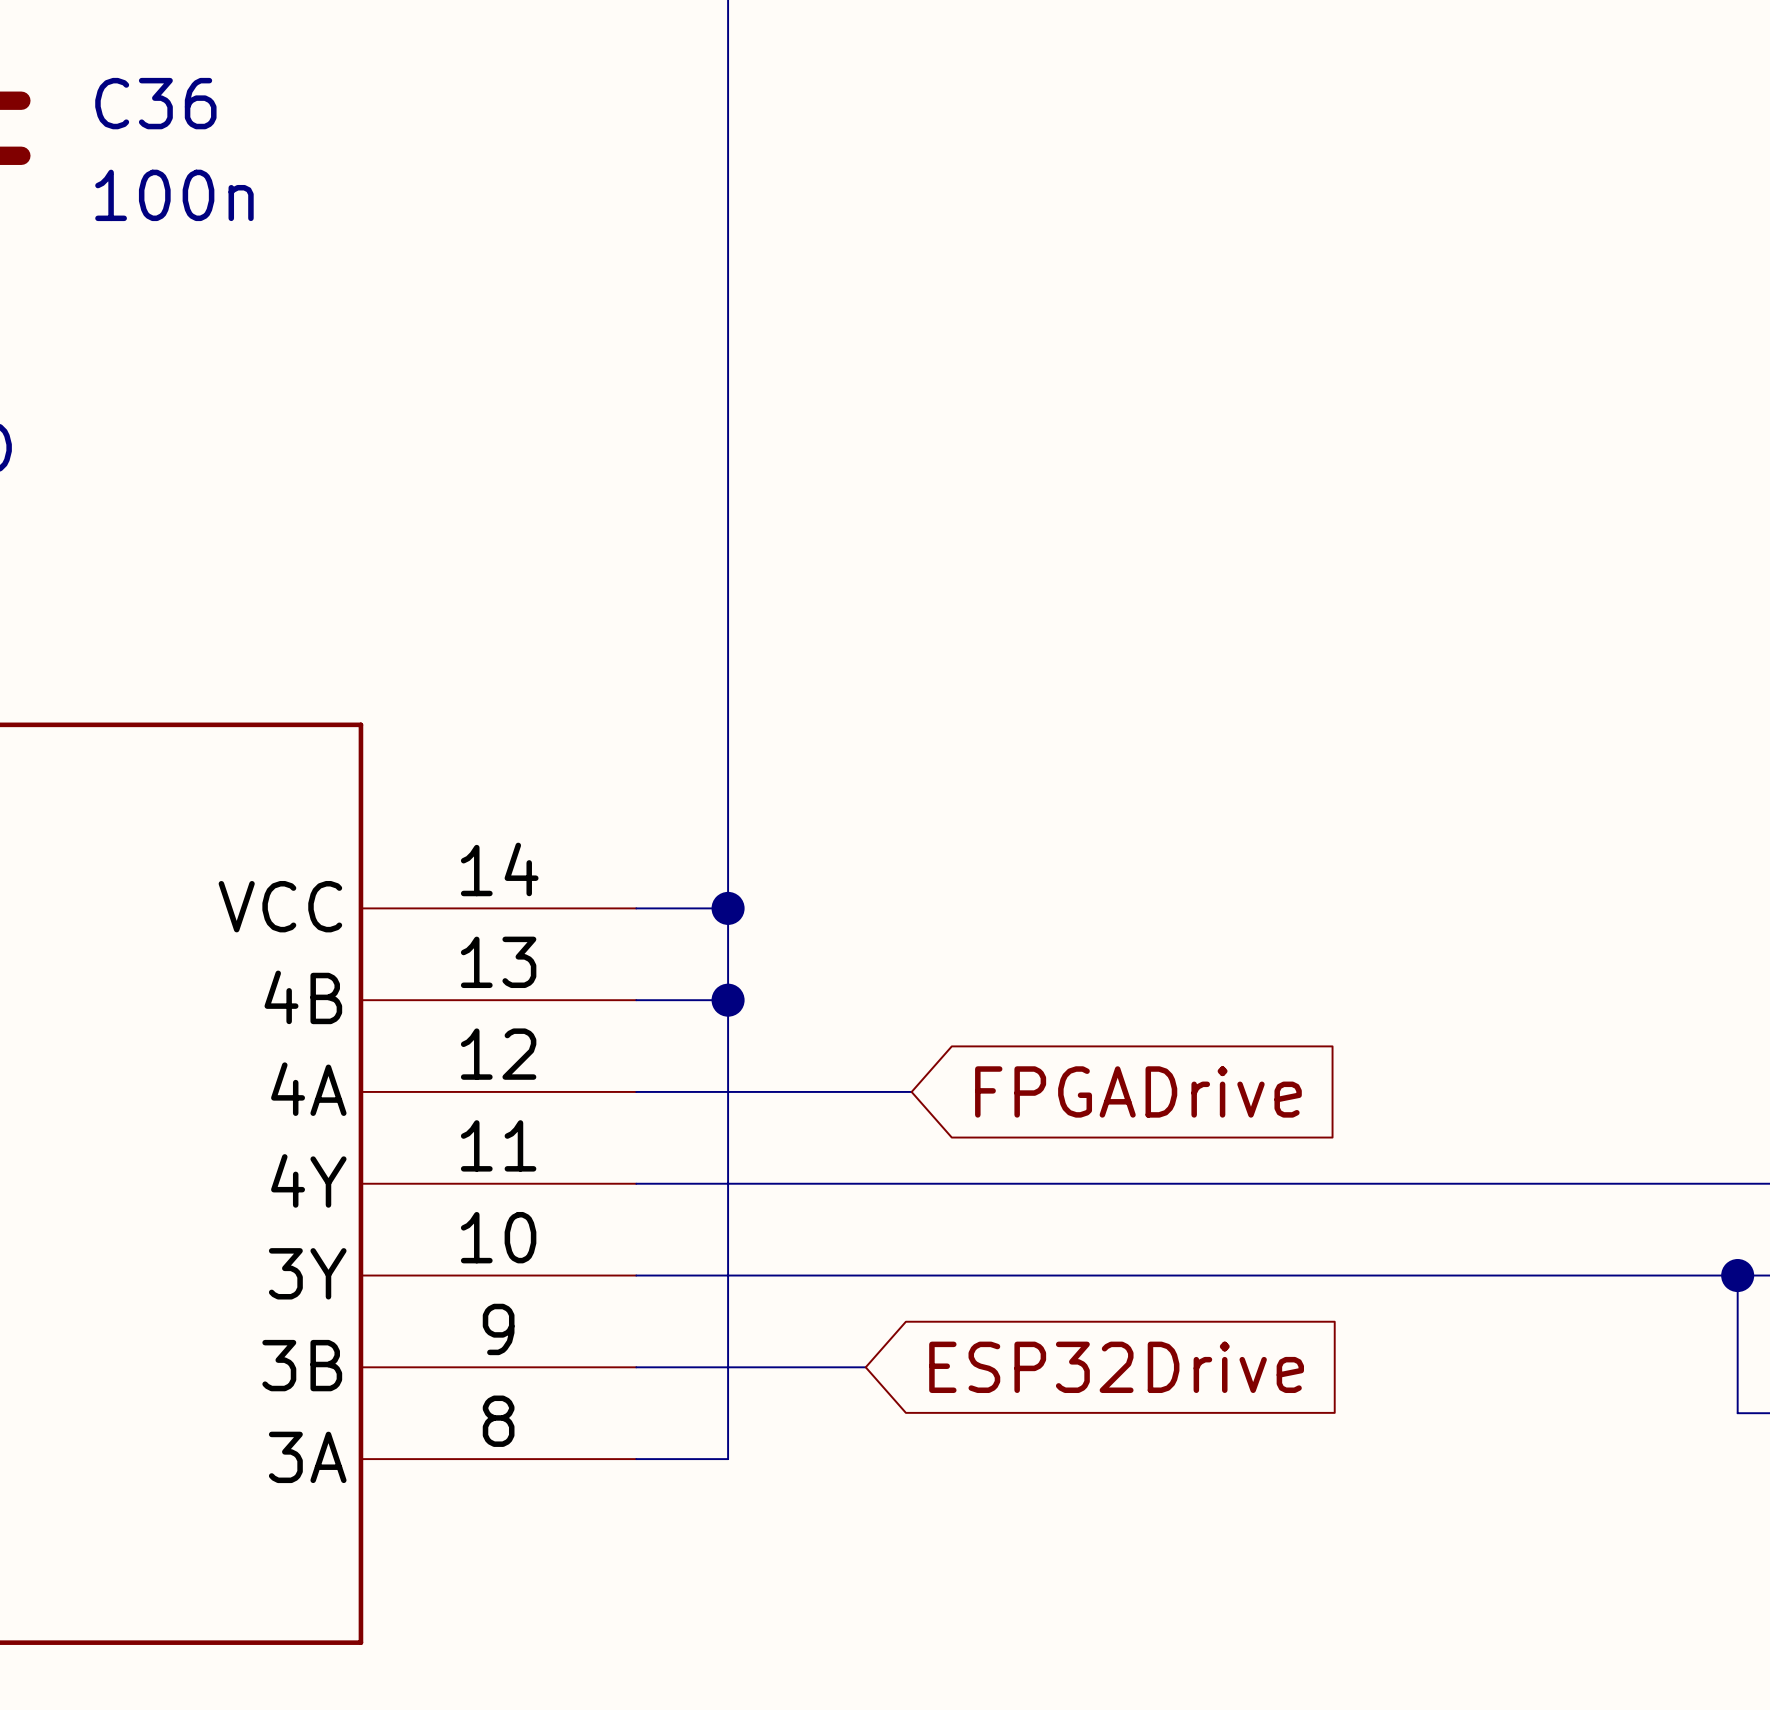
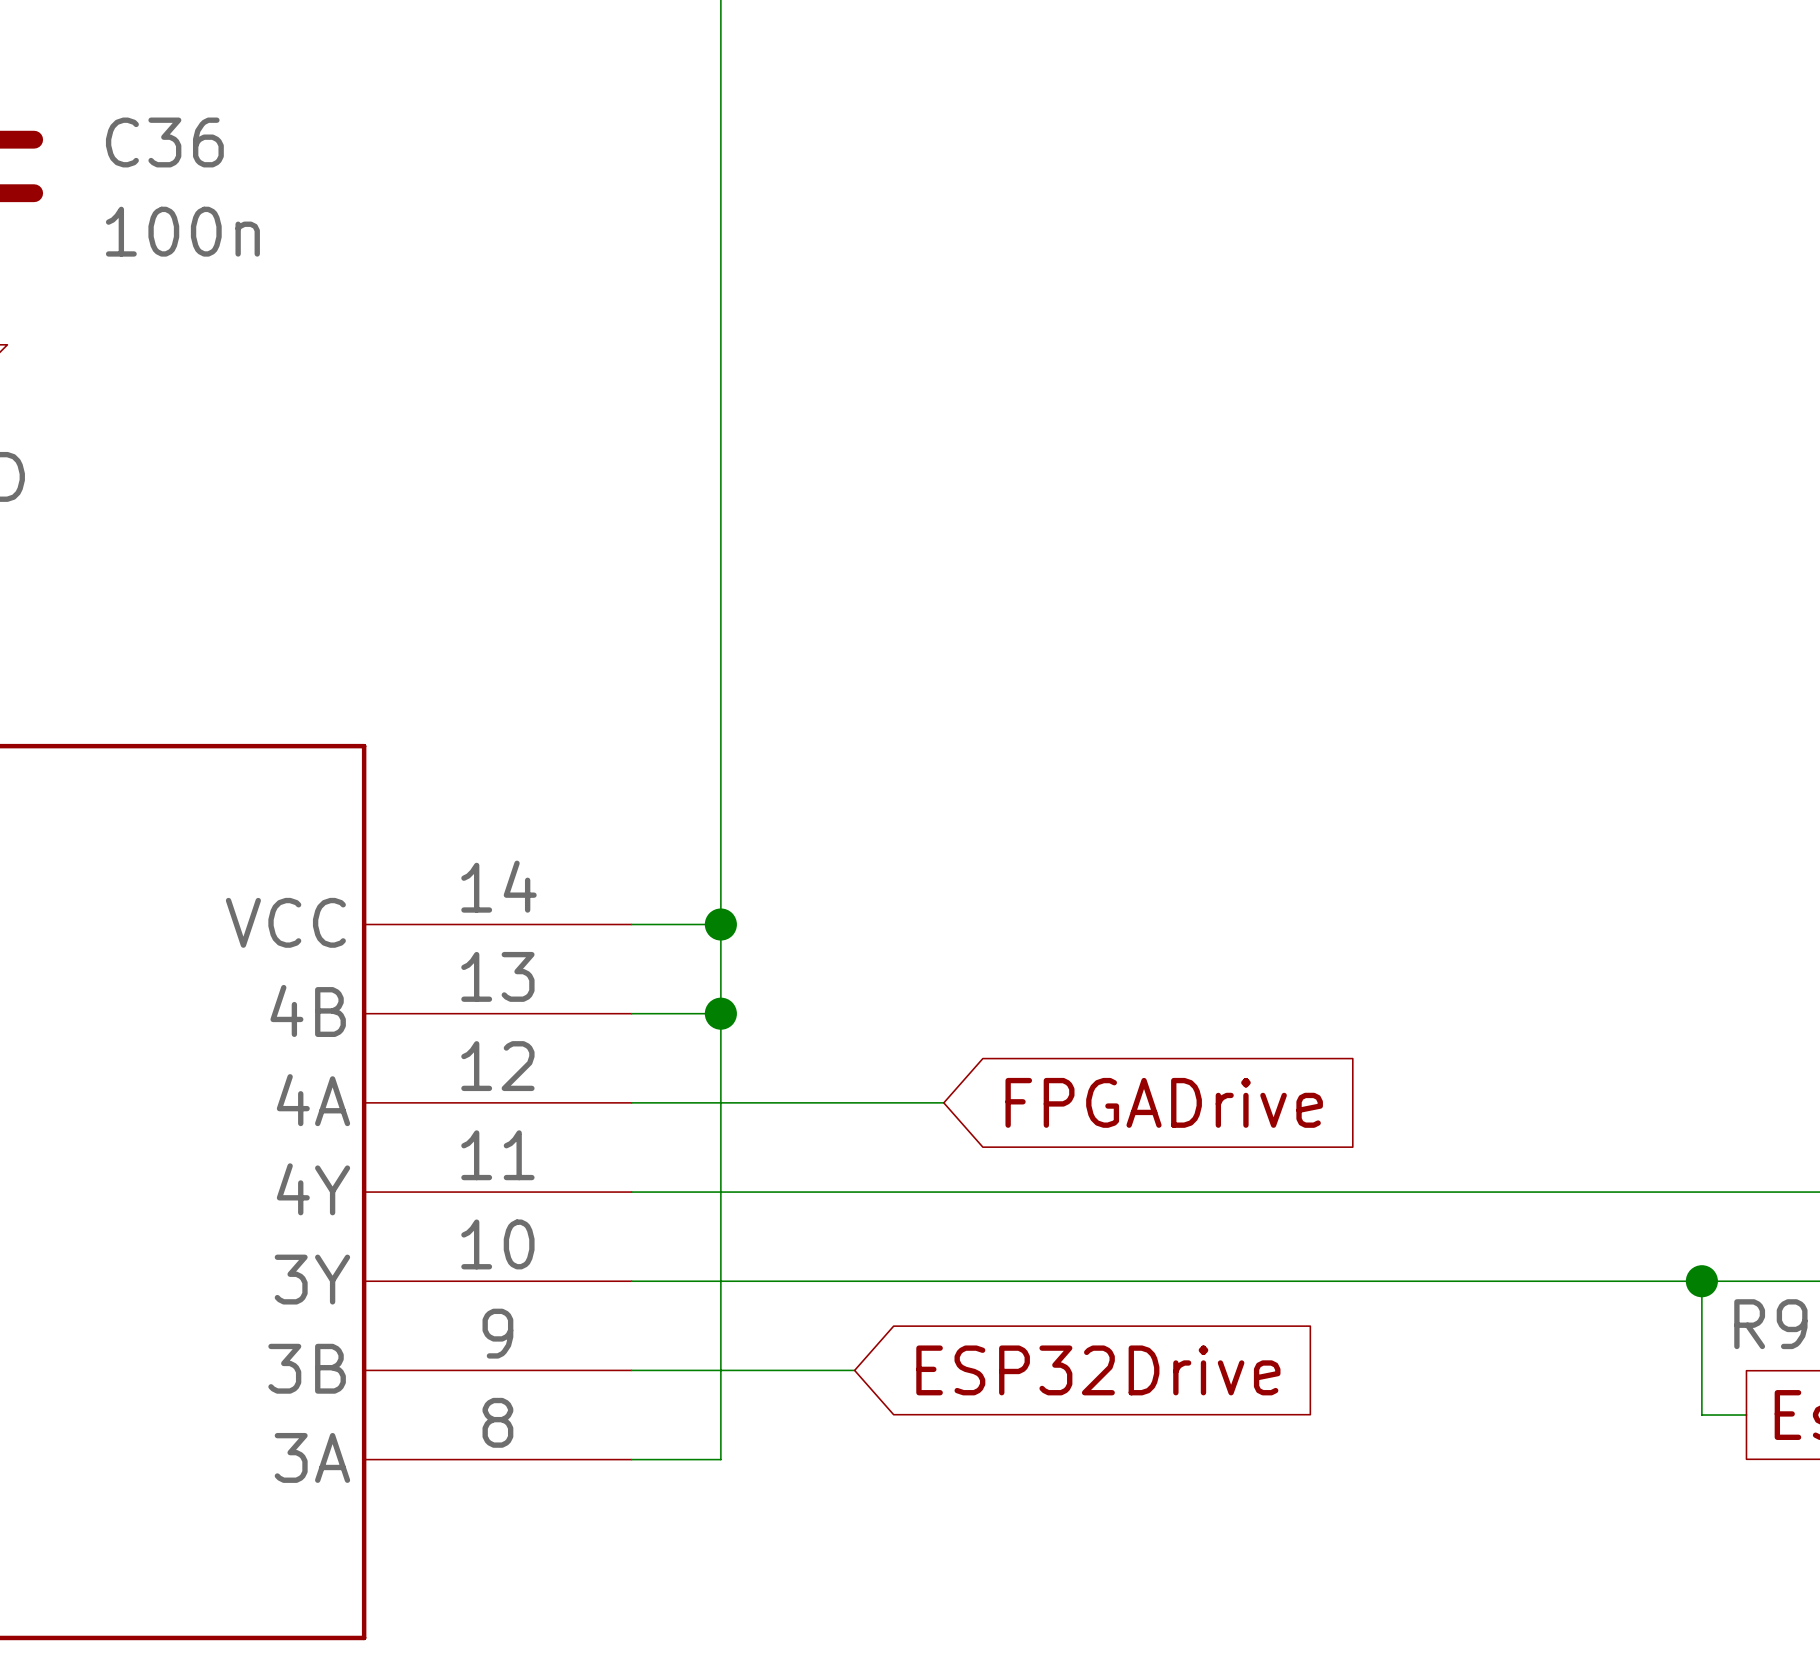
wire: none -> (899, 1102) (943, 1102)
global label position: FPGADrive (1138, 1091) -> FPGADrive (1164, 1102)

